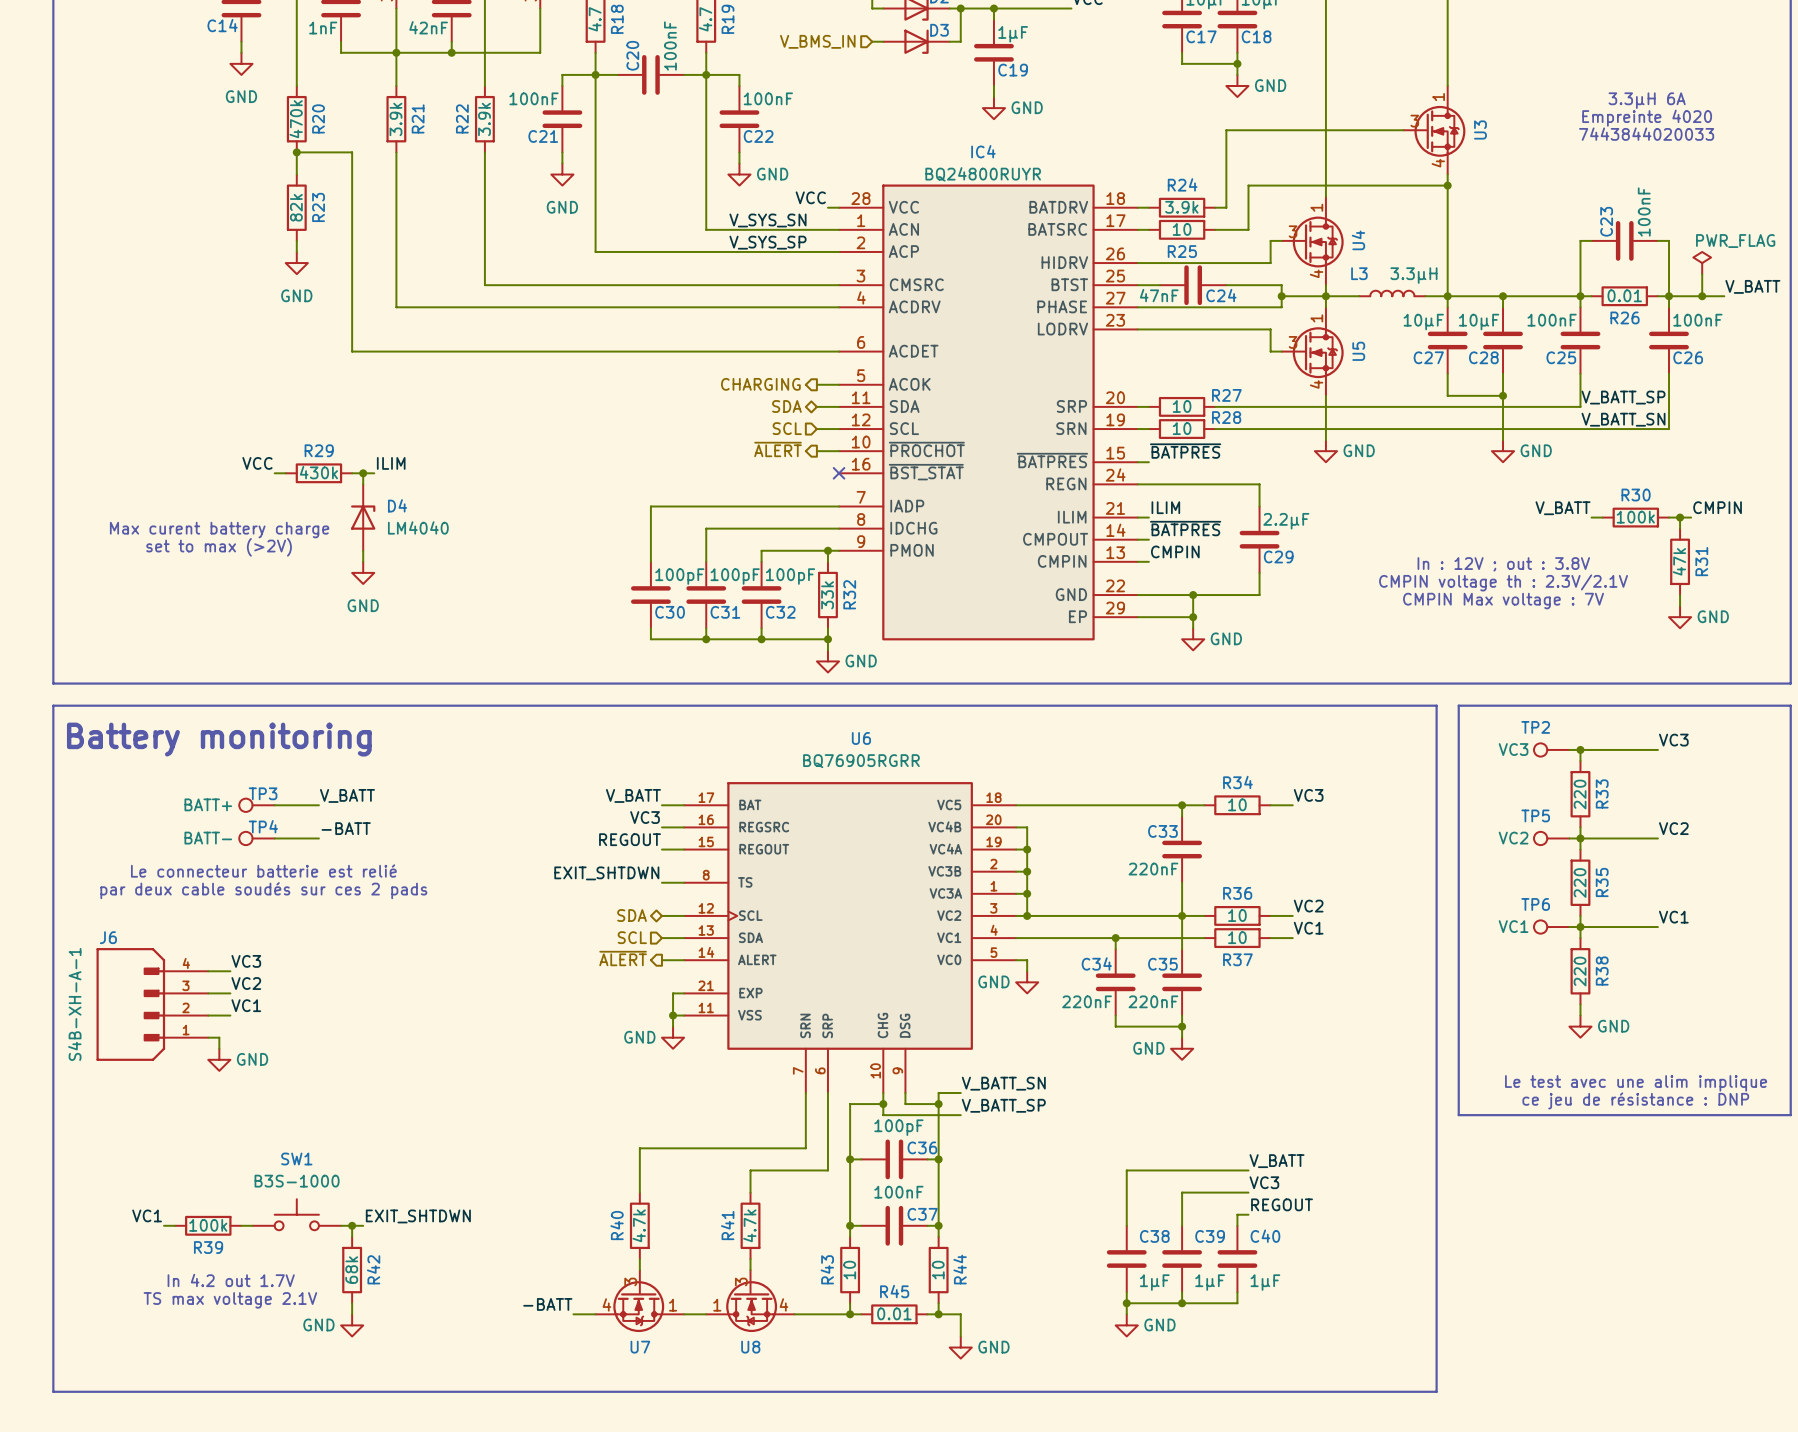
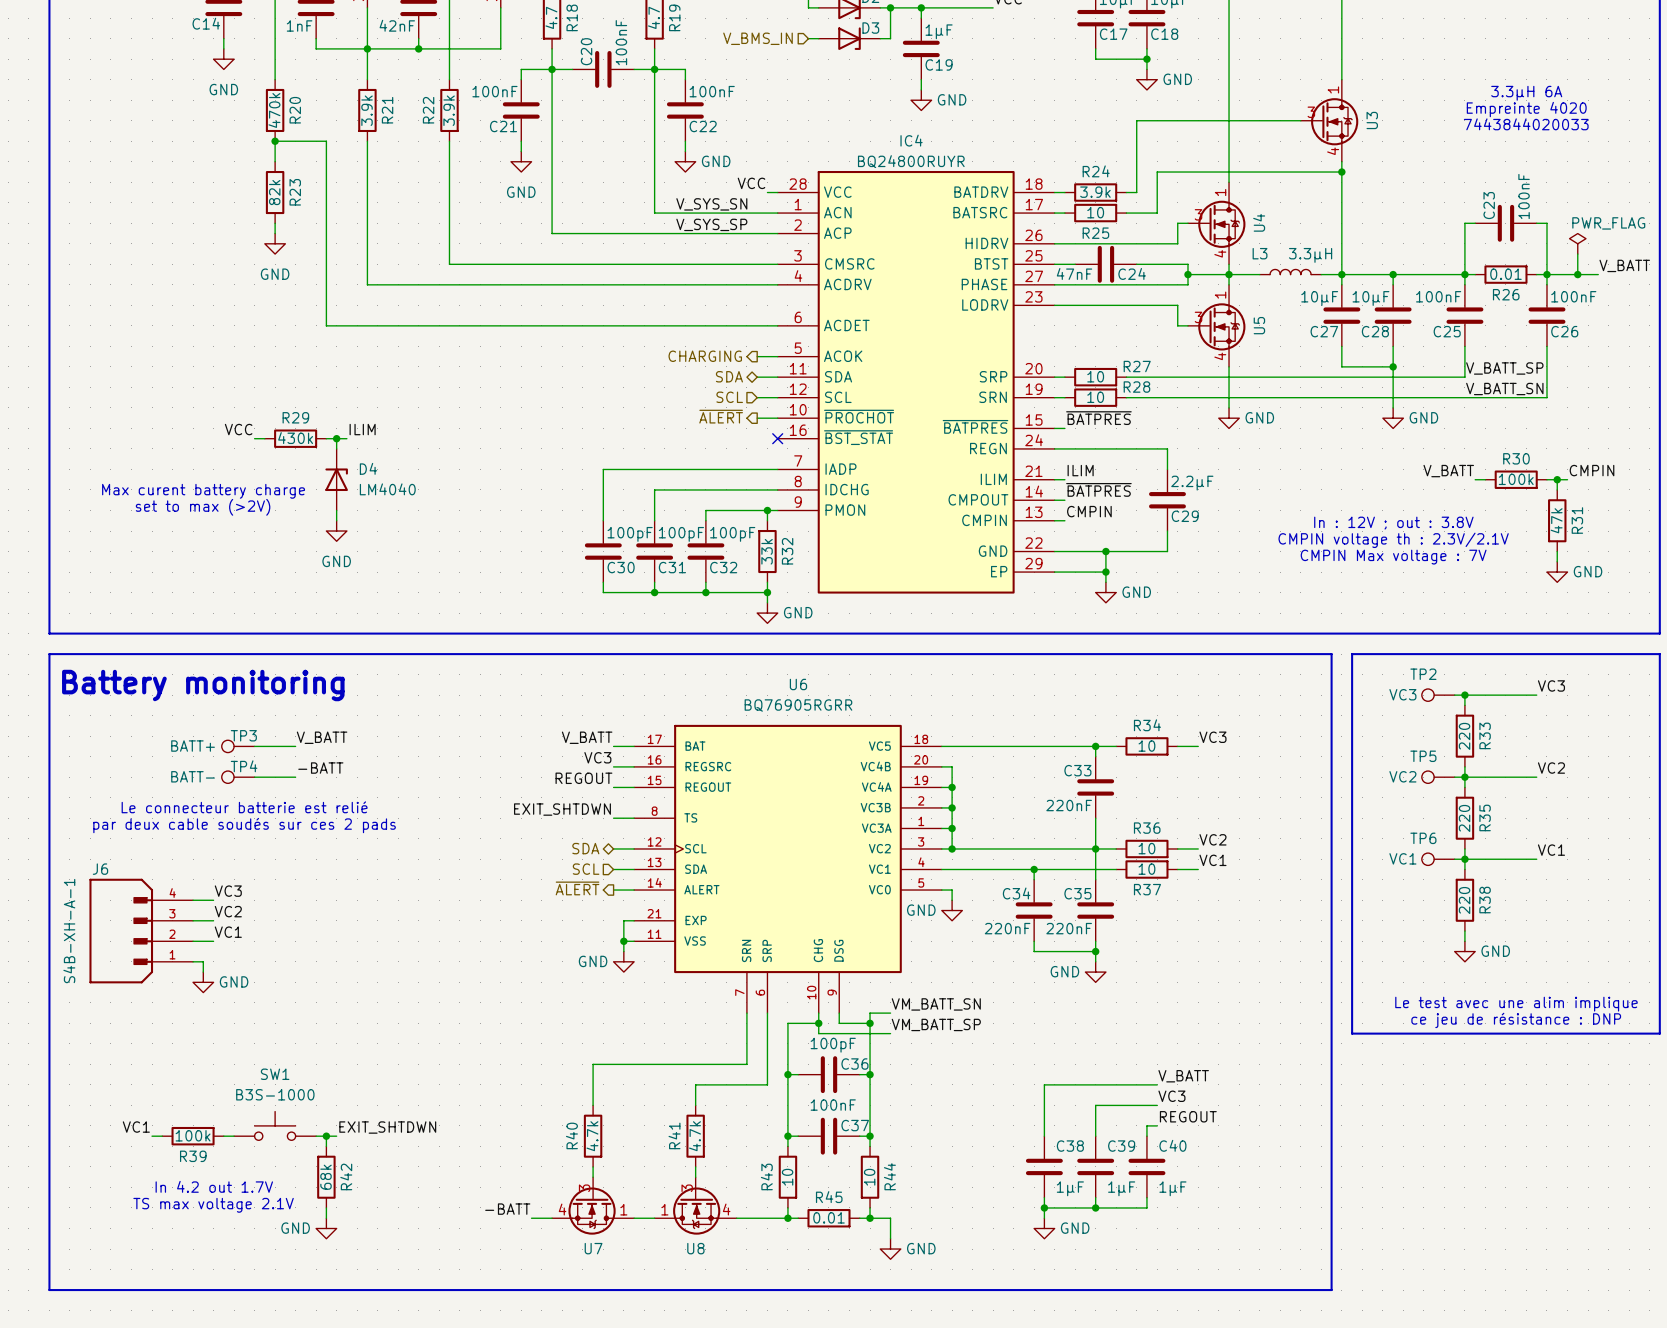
label: V_BATT_SN (1003, 1083) -> VM_BATT_SN (936, 1004)
label: V_BATT_SP (1003, 1105) -> VM_BATT_SP (936, 1024)

